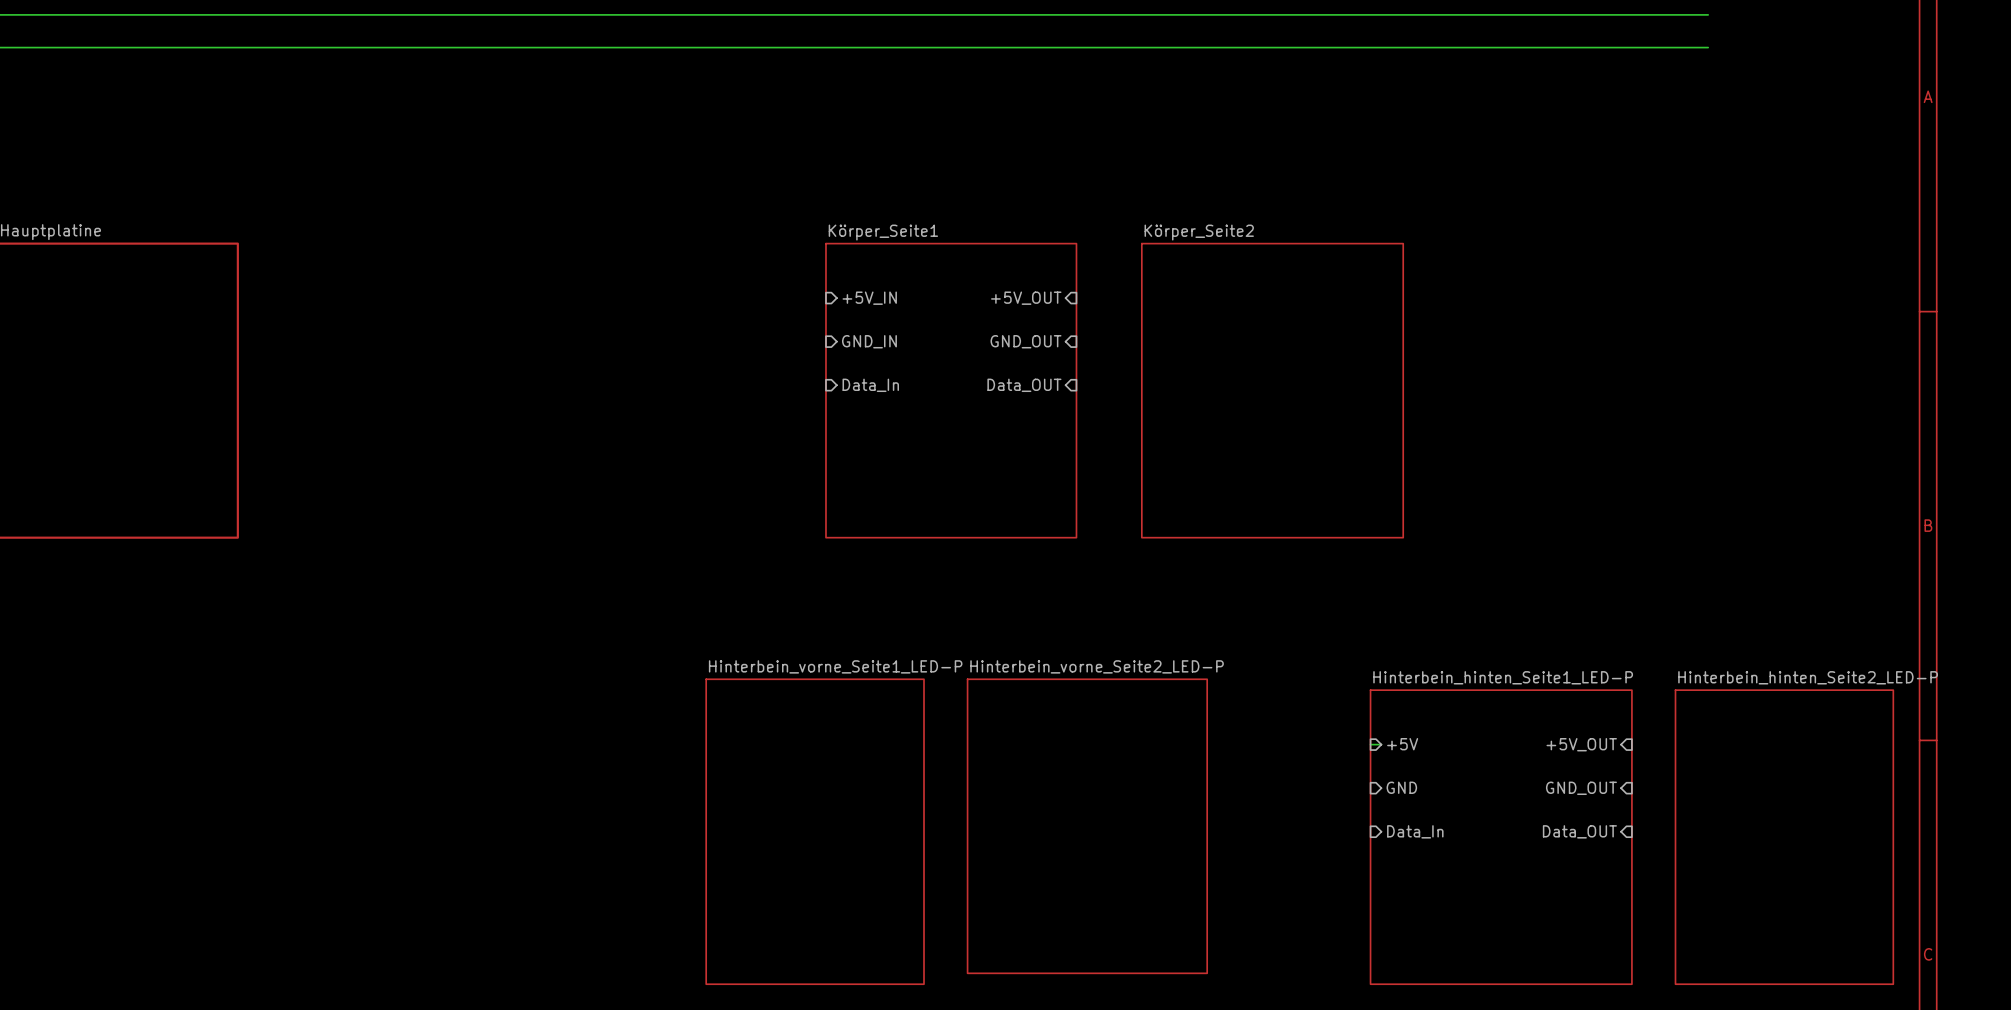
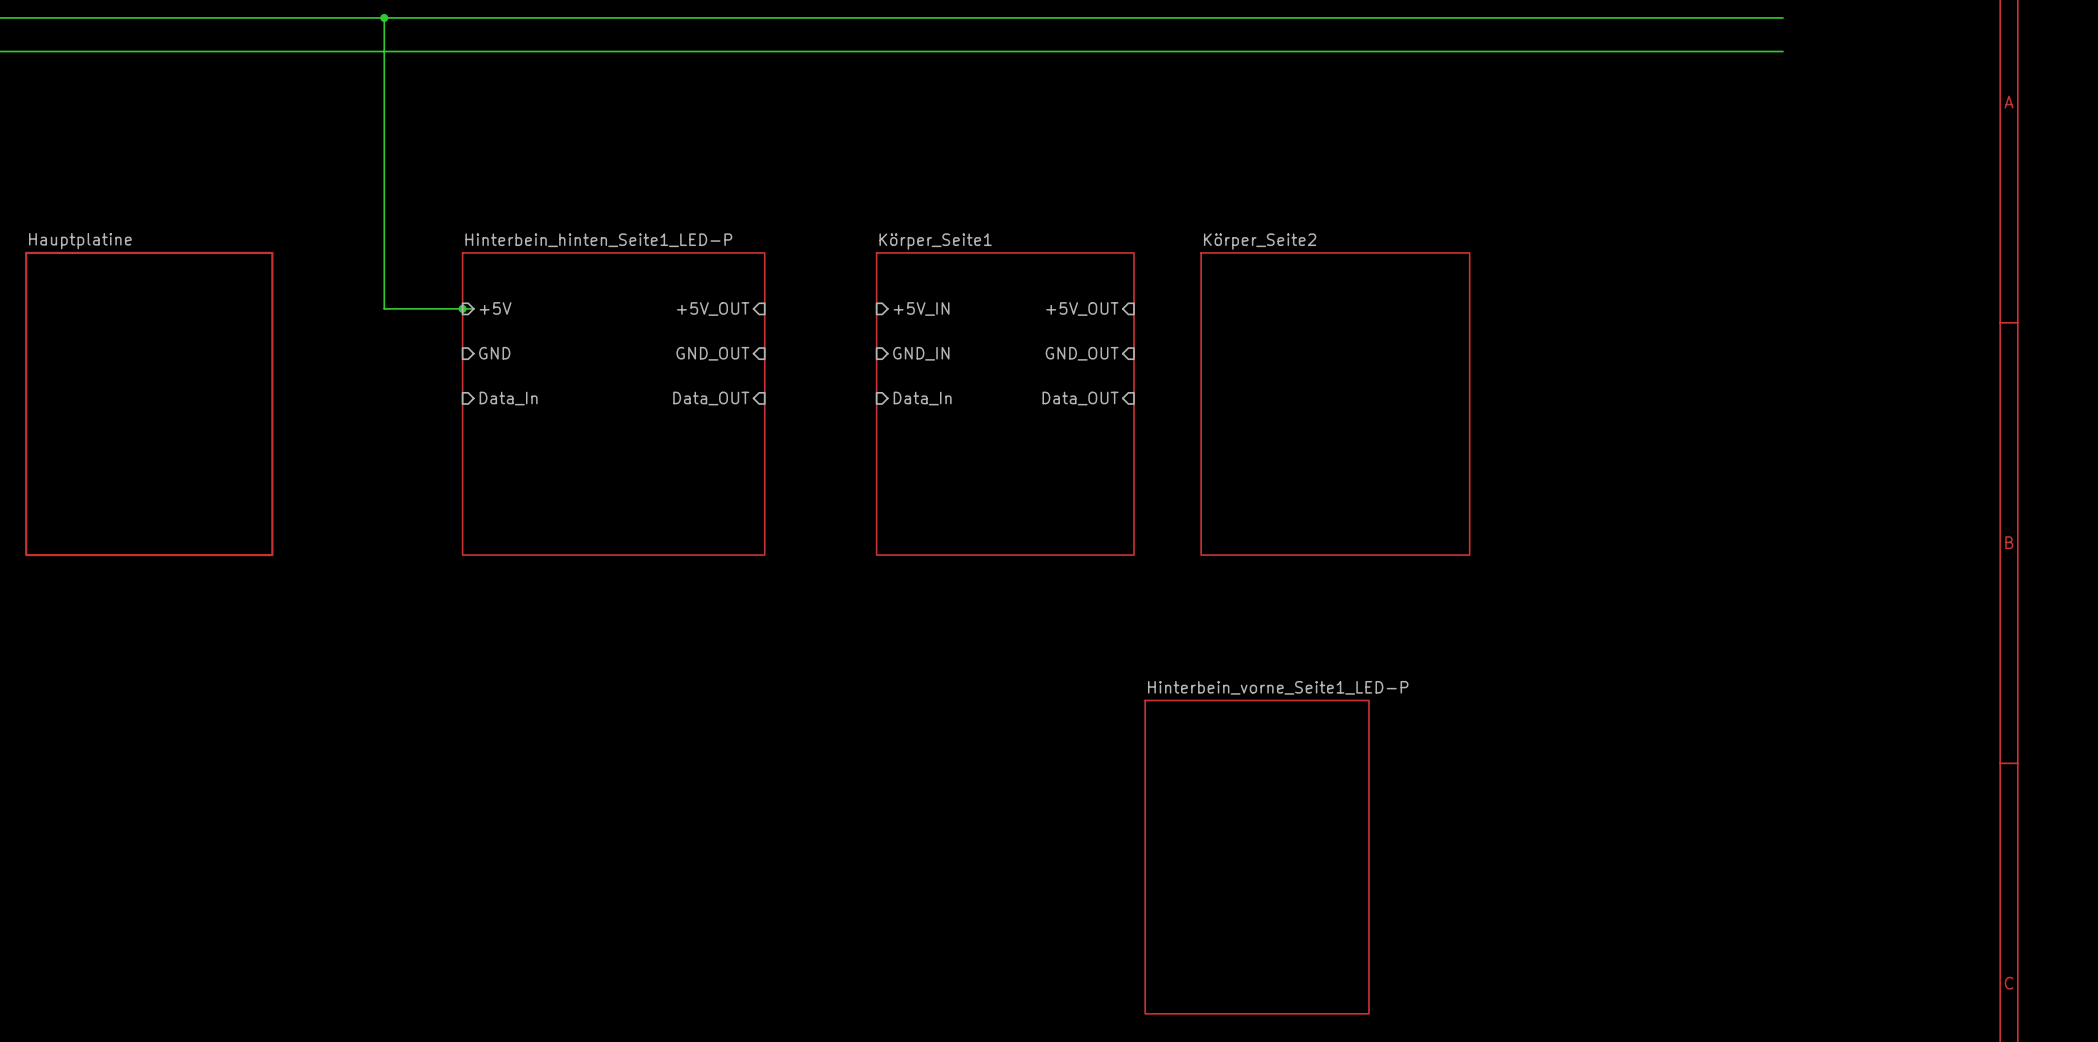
wire: none -> (384, 17) (384, 308) (473, 308)
junction: none -> (384, 17)
sheet pin: none -> +5V (495, 308)
junction: none -> (462, 308)
sheet pin: none -> +5V_OUT (713, 308)
sheet pin: none -> GND (494, 353)
sheet pin: none -> GND_OUT (712, 353)
sheet pin: none -> Data_In (508, 398)
sheet pin: none -> Data_OUT (711, 398)
sheet Hinterbein_hinten_Seite1_LED-P shape: [1369, 689, 1633, 985] -> [461, 252, 766, 556]
wire: (1370, 744) (1381, 744) -> none
sheet pin: +5V (1402, 744) -> none
sheet pin: +5V_OUT (1581, 744) -> none
sheet pin: GND (1401, 787) -> none
sheet pin: GND_OUT (1581, 788) -> none
sheet Hinterbein_vorne_Seite2_LED-P: (1087, 826) -> none
sheet Hinterbein_vorne_Seite1_LED-P position: (815, 831) -> (1257, 857)
sheet pin: Data_In (1415, 831) -> none
sheet pin: Data_OUT (1579, 831) -> none
sheet Hinterbein_hinten_Seite2_LED-P: (1784, 837) -> none

